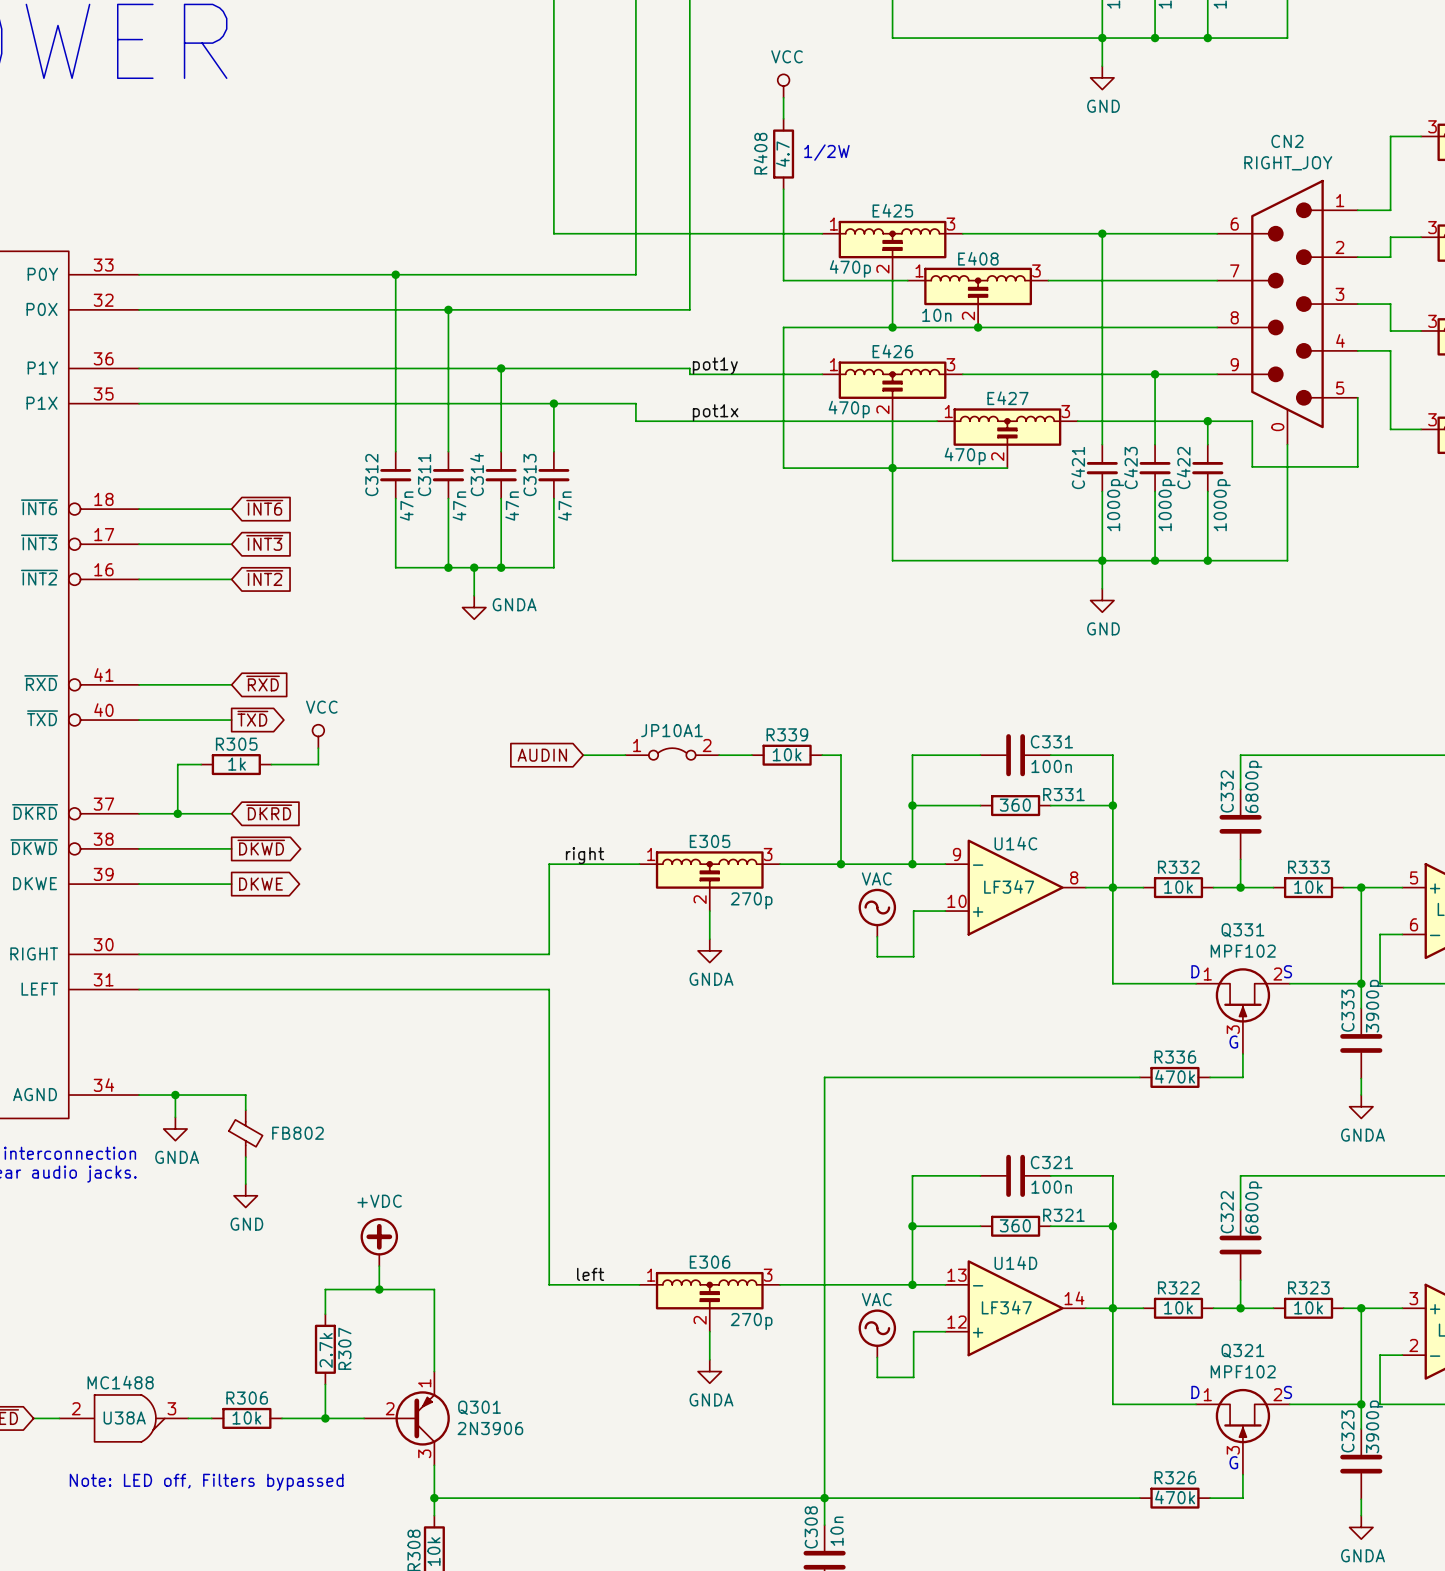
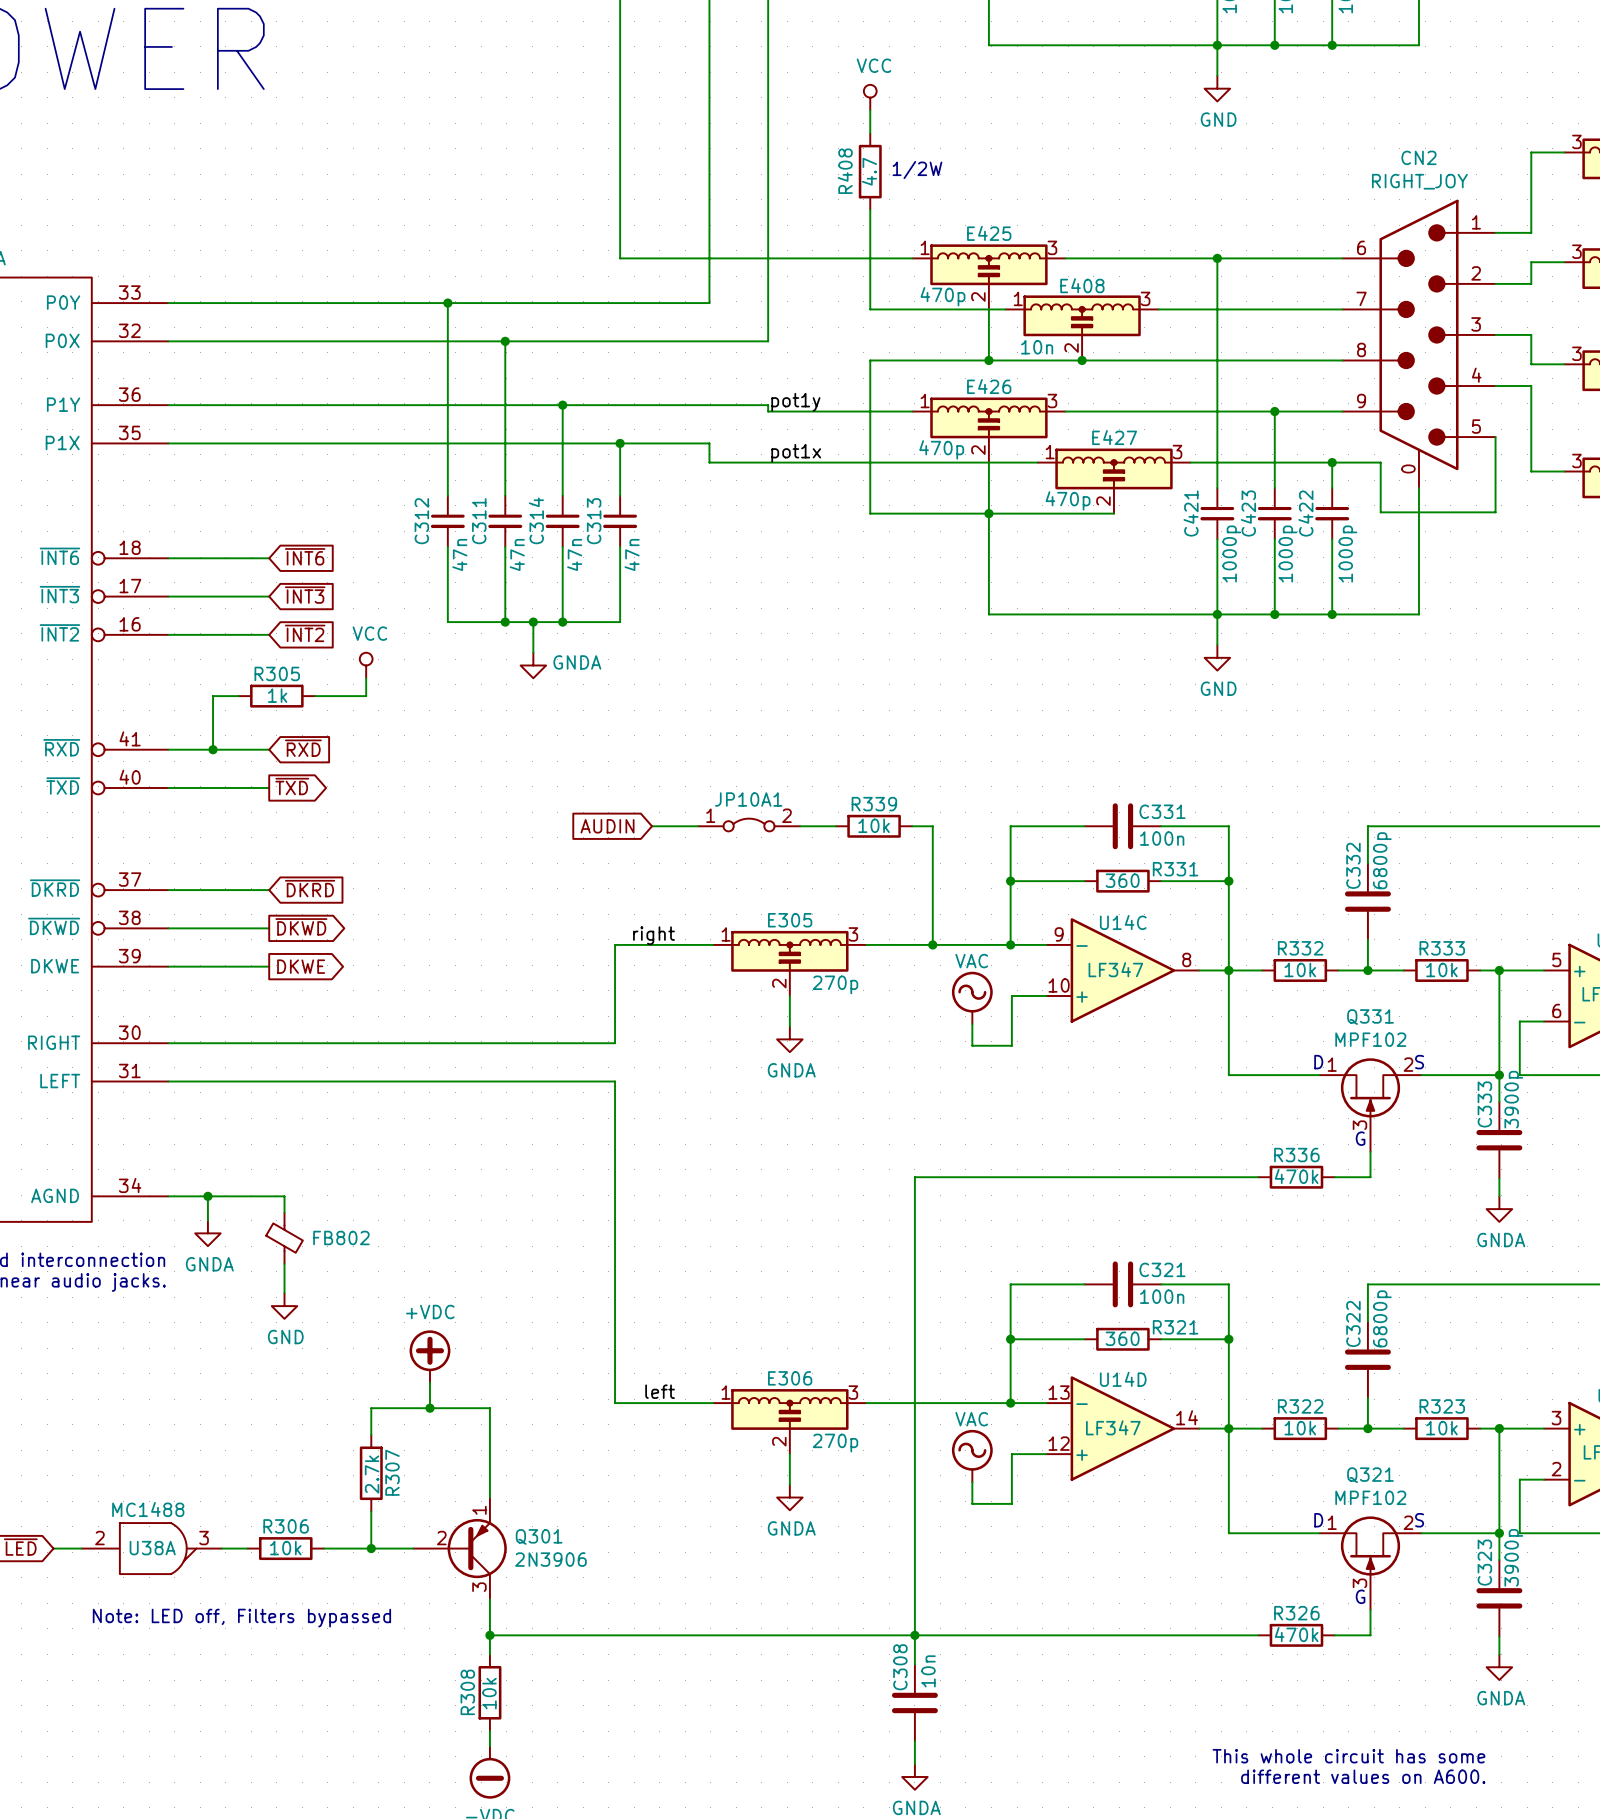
junction: none -> (213, 749)
power symbol position: VCC (318, 736) -> VCC (366, 665)
wire: (318, 748) (318, 764) (271, 764) -> (366, 678) (366, 696) (315, 696)
wire: (201, 764) (177, 764) (177, 813) -> (238, 696) (213, 696) (213, 749)
R305 position: (236, 764) -> (276, 696)
junction: (177, 813) -> none

